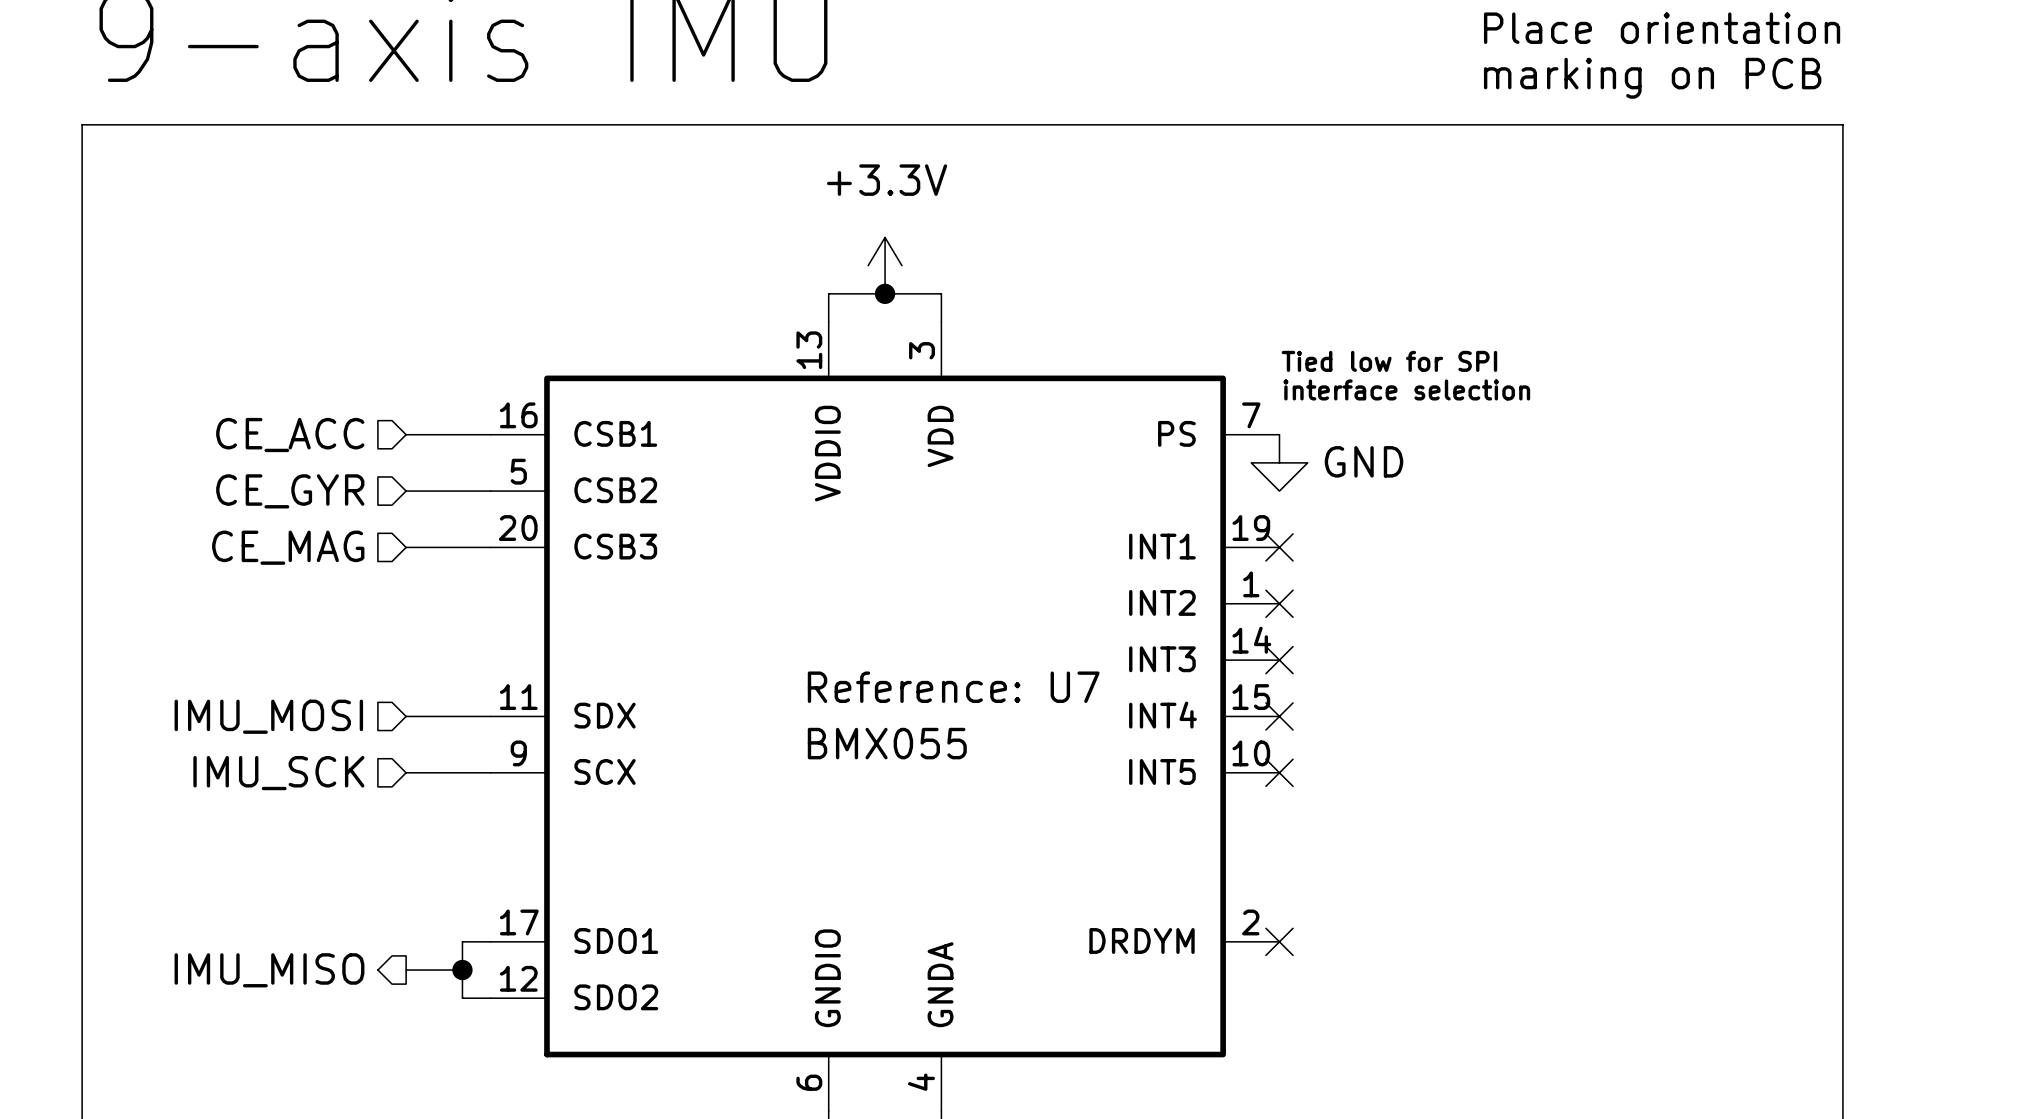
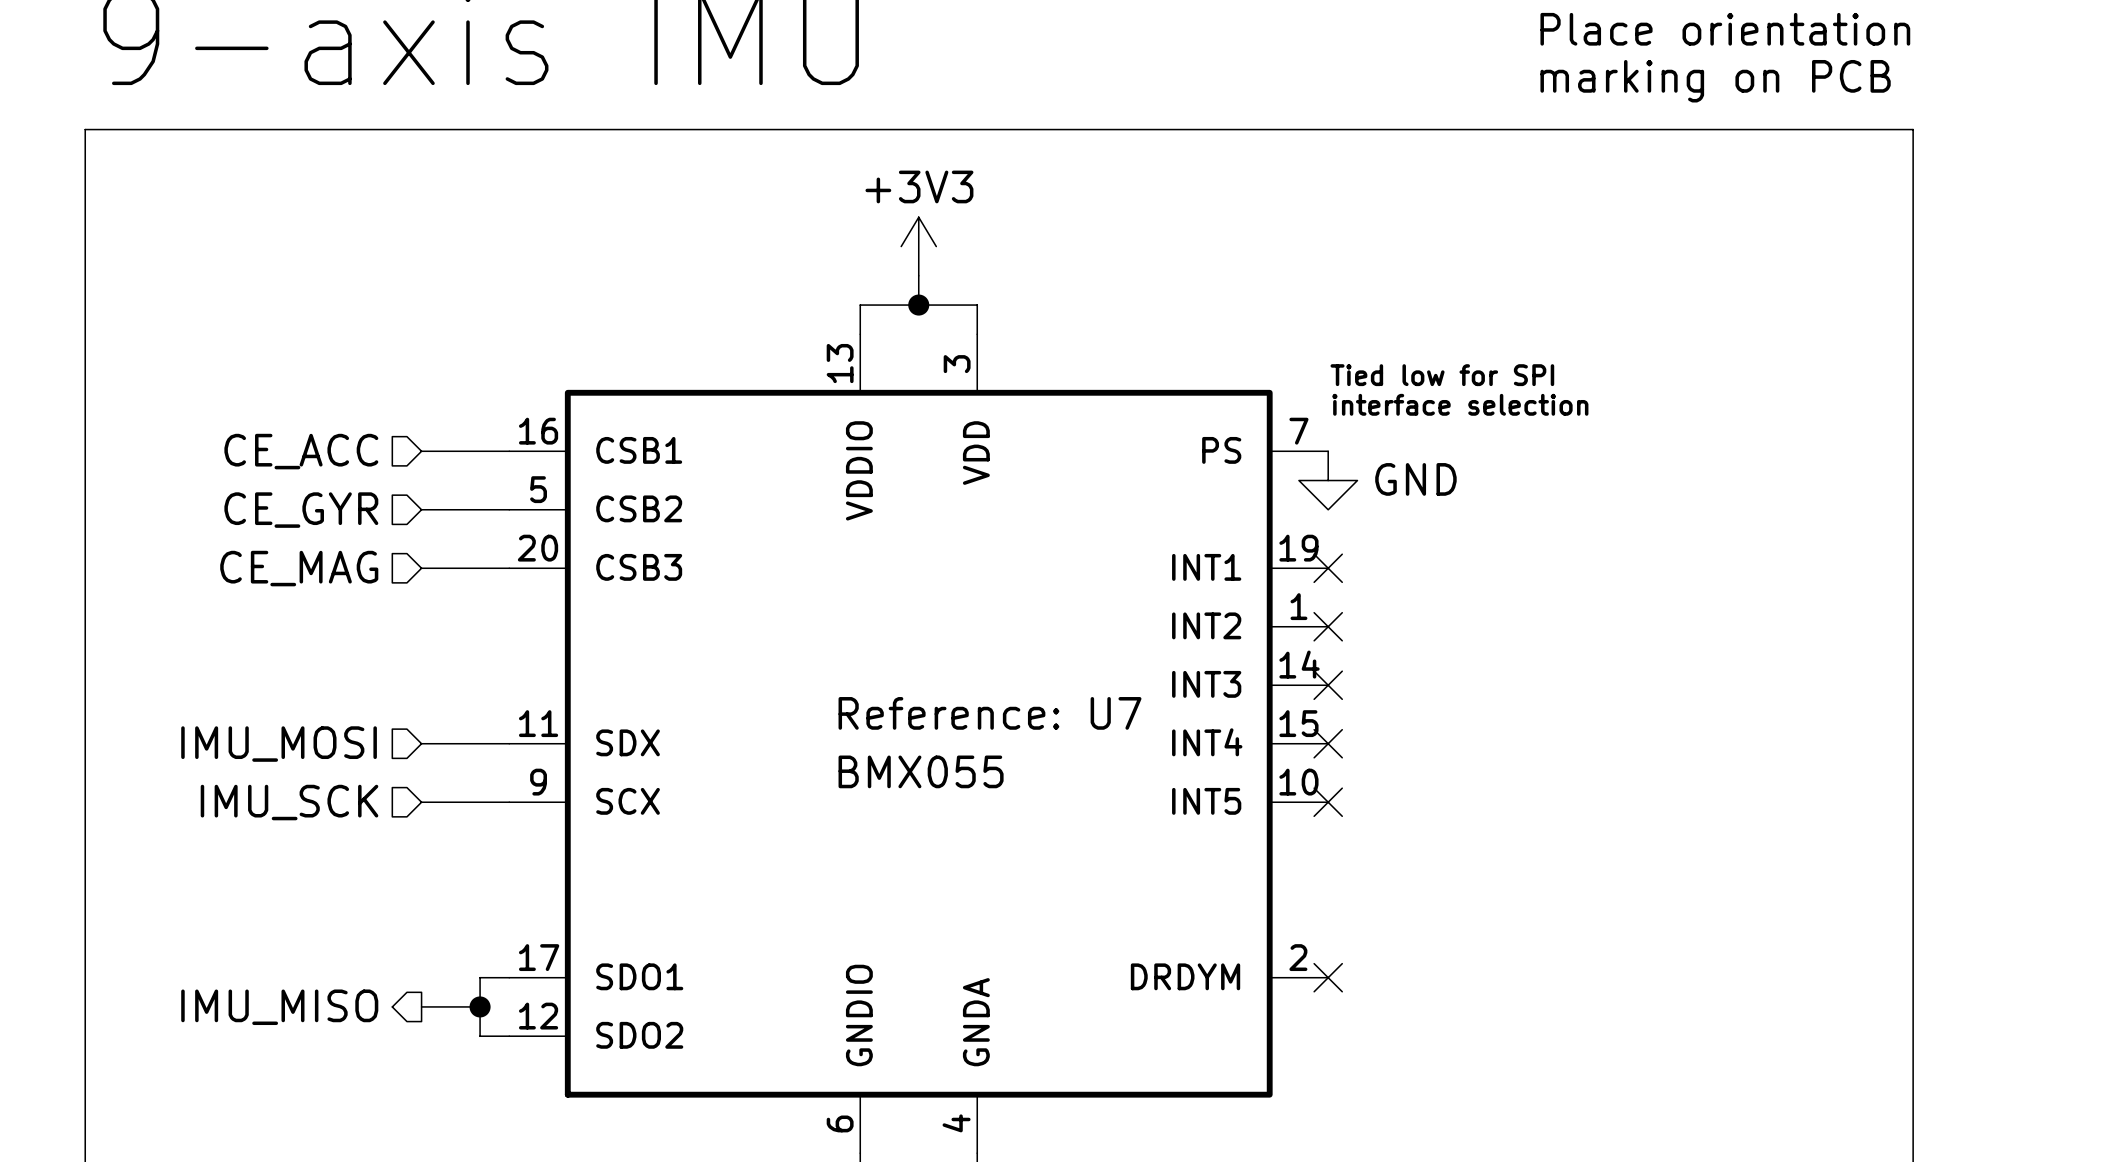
power symbol: none -> +3V3 (918, 246)
power symbol: +3.3V (885, 265) -> none

